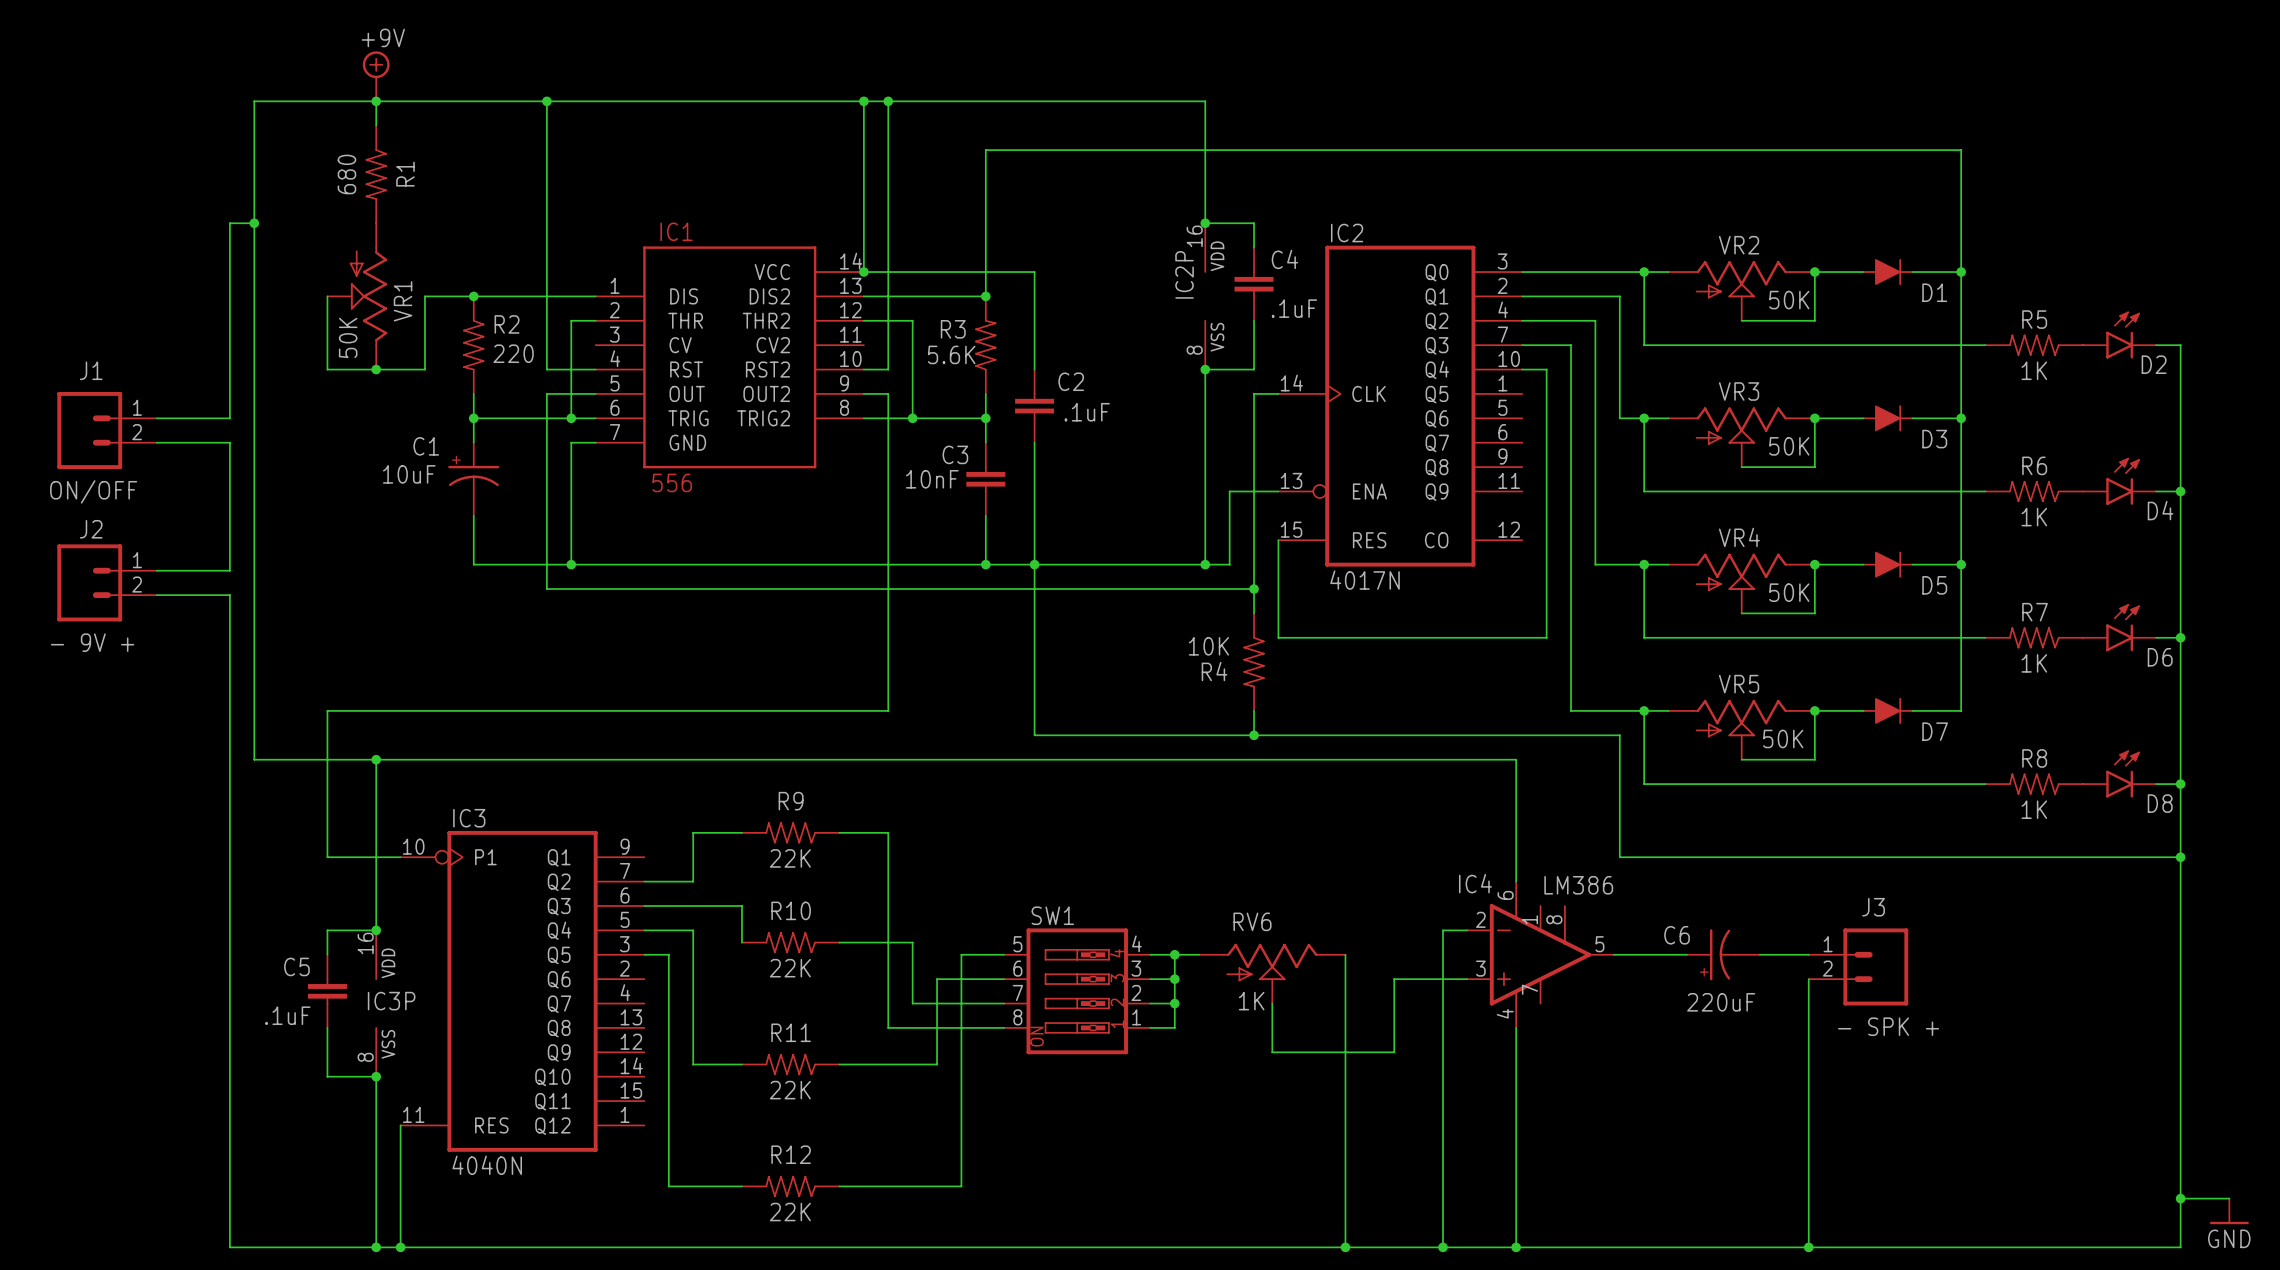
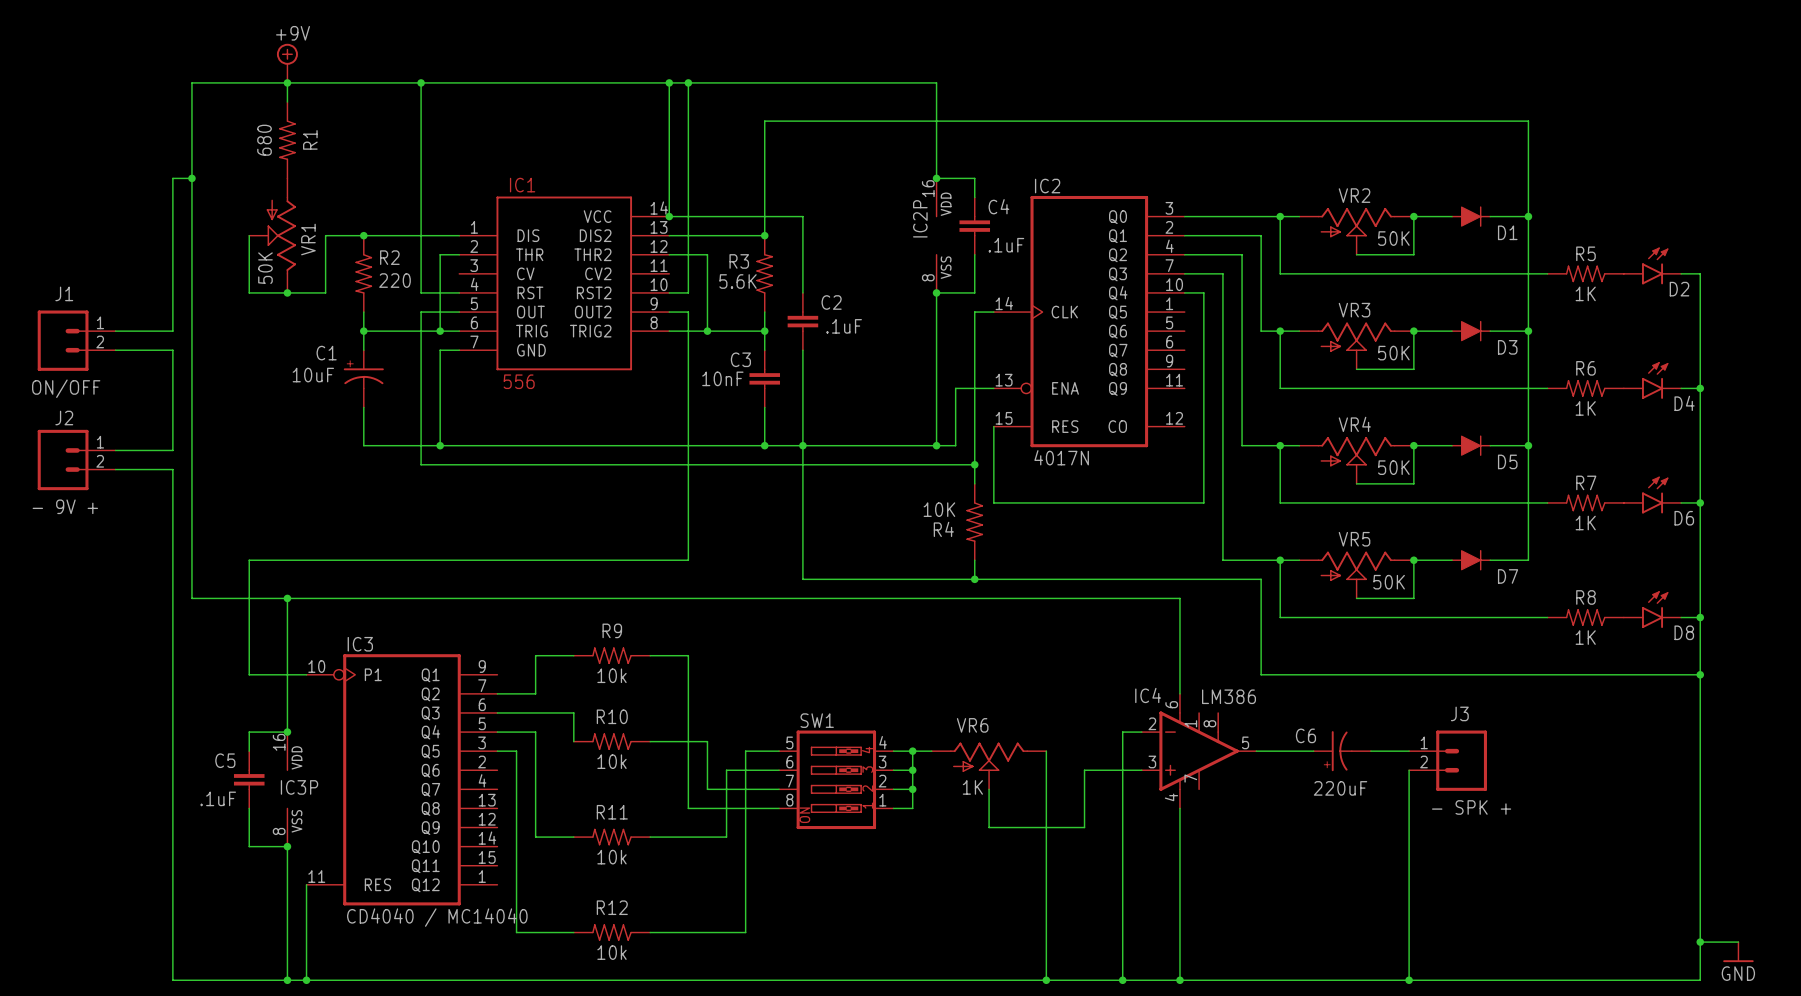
R9 value: 22K (790, 858) -> 10k (612, 675)
RV6 name: RV6 (1252, 921) -> VR6 (972, 725)
R10 value: 22K (790, 968) -> 10k (612, 761)
R11 value: 22K (790, 1090) -> 10k (612, 857)
IC3 value: 4040N (487, 1165) -> CD4040 / MC14040 (437, 917)
R12 value: 22K (790, 1212) -> 10k (612, 952)

